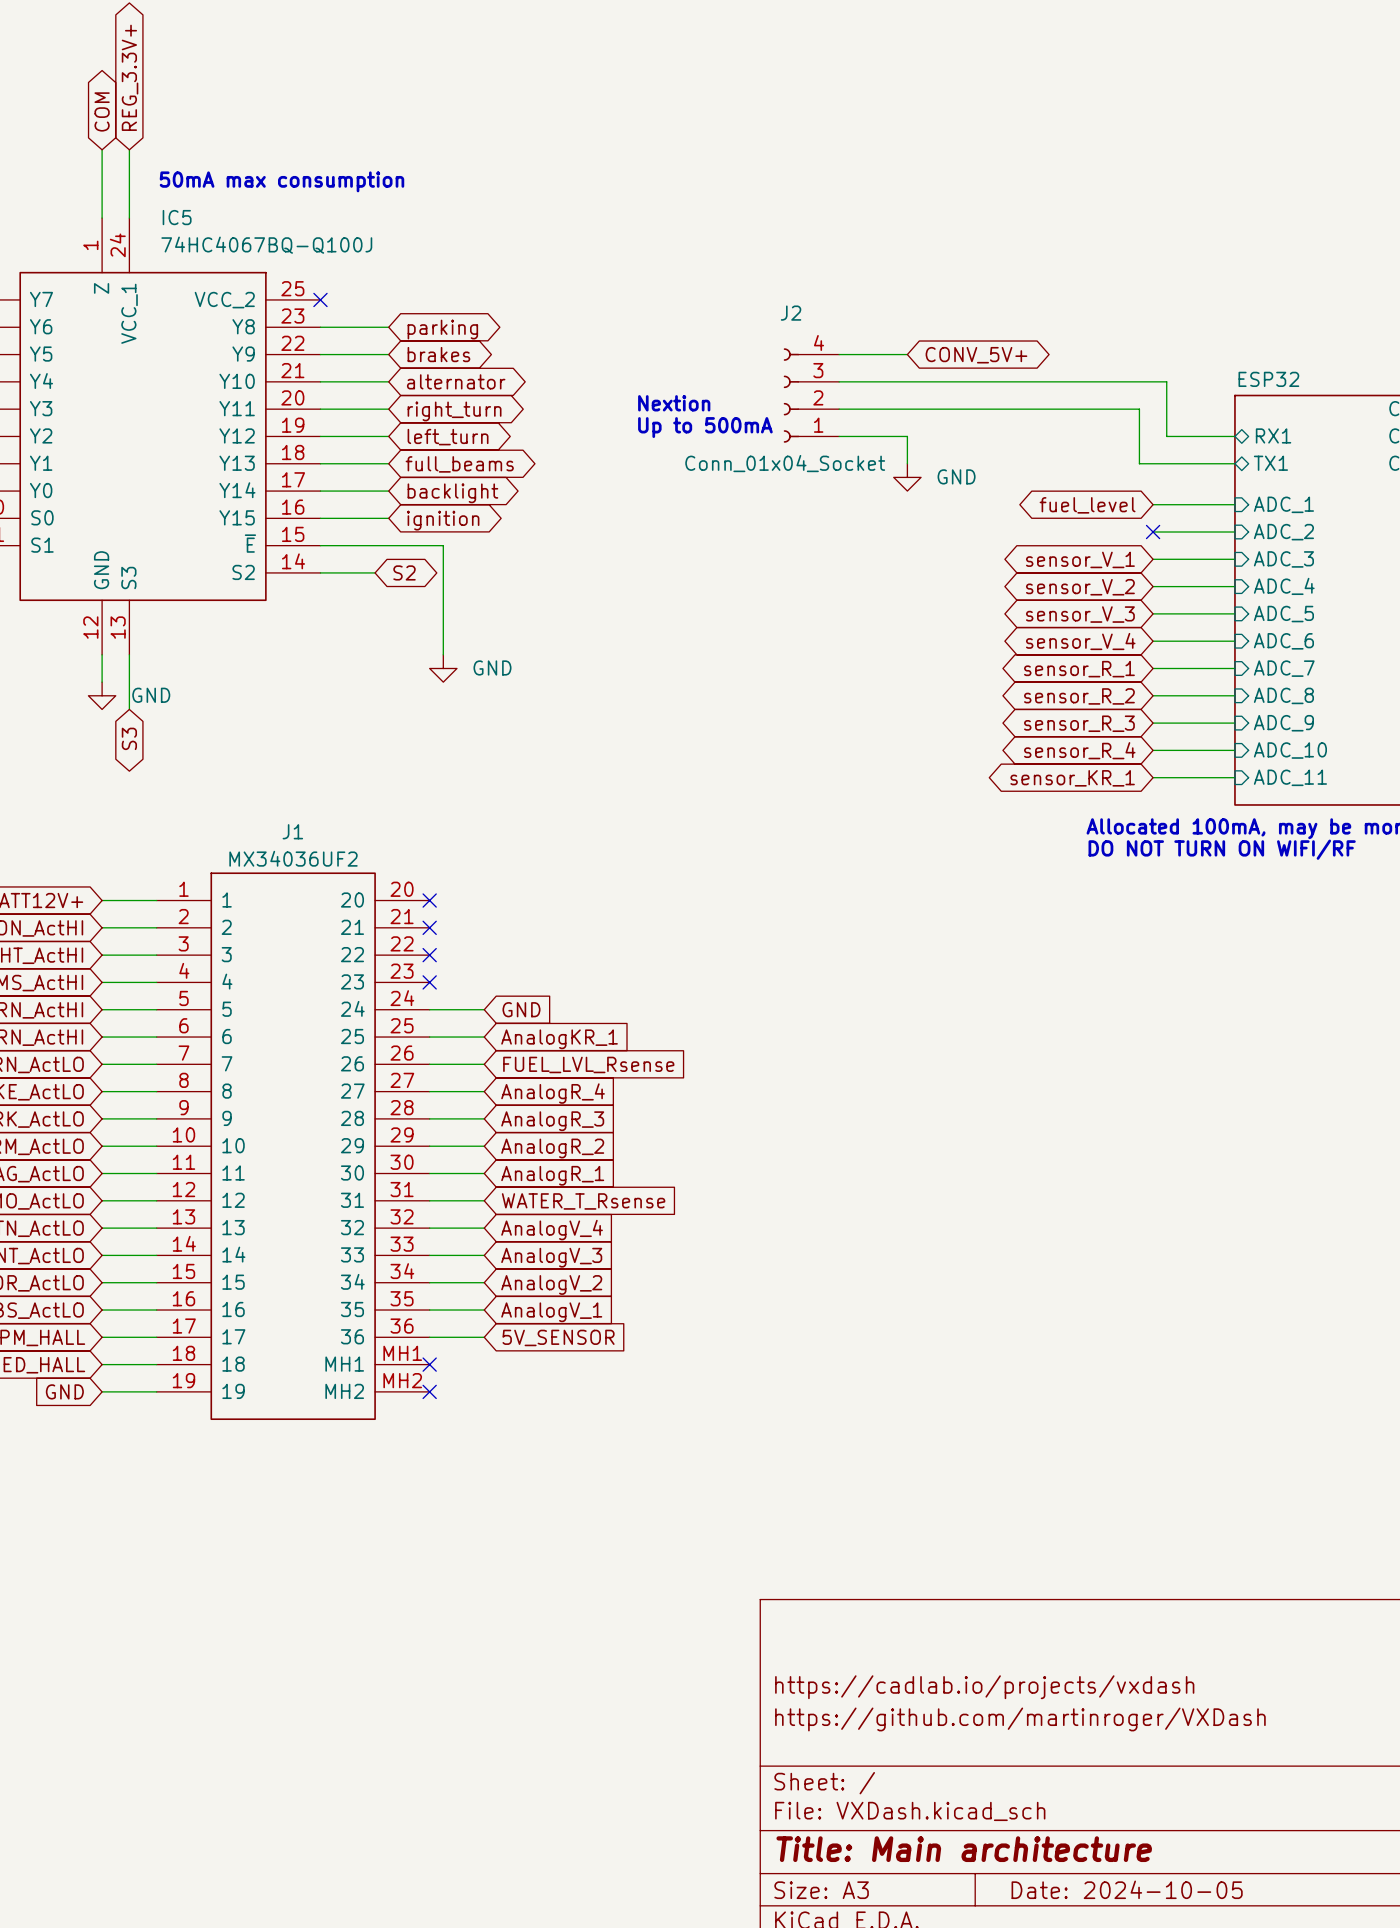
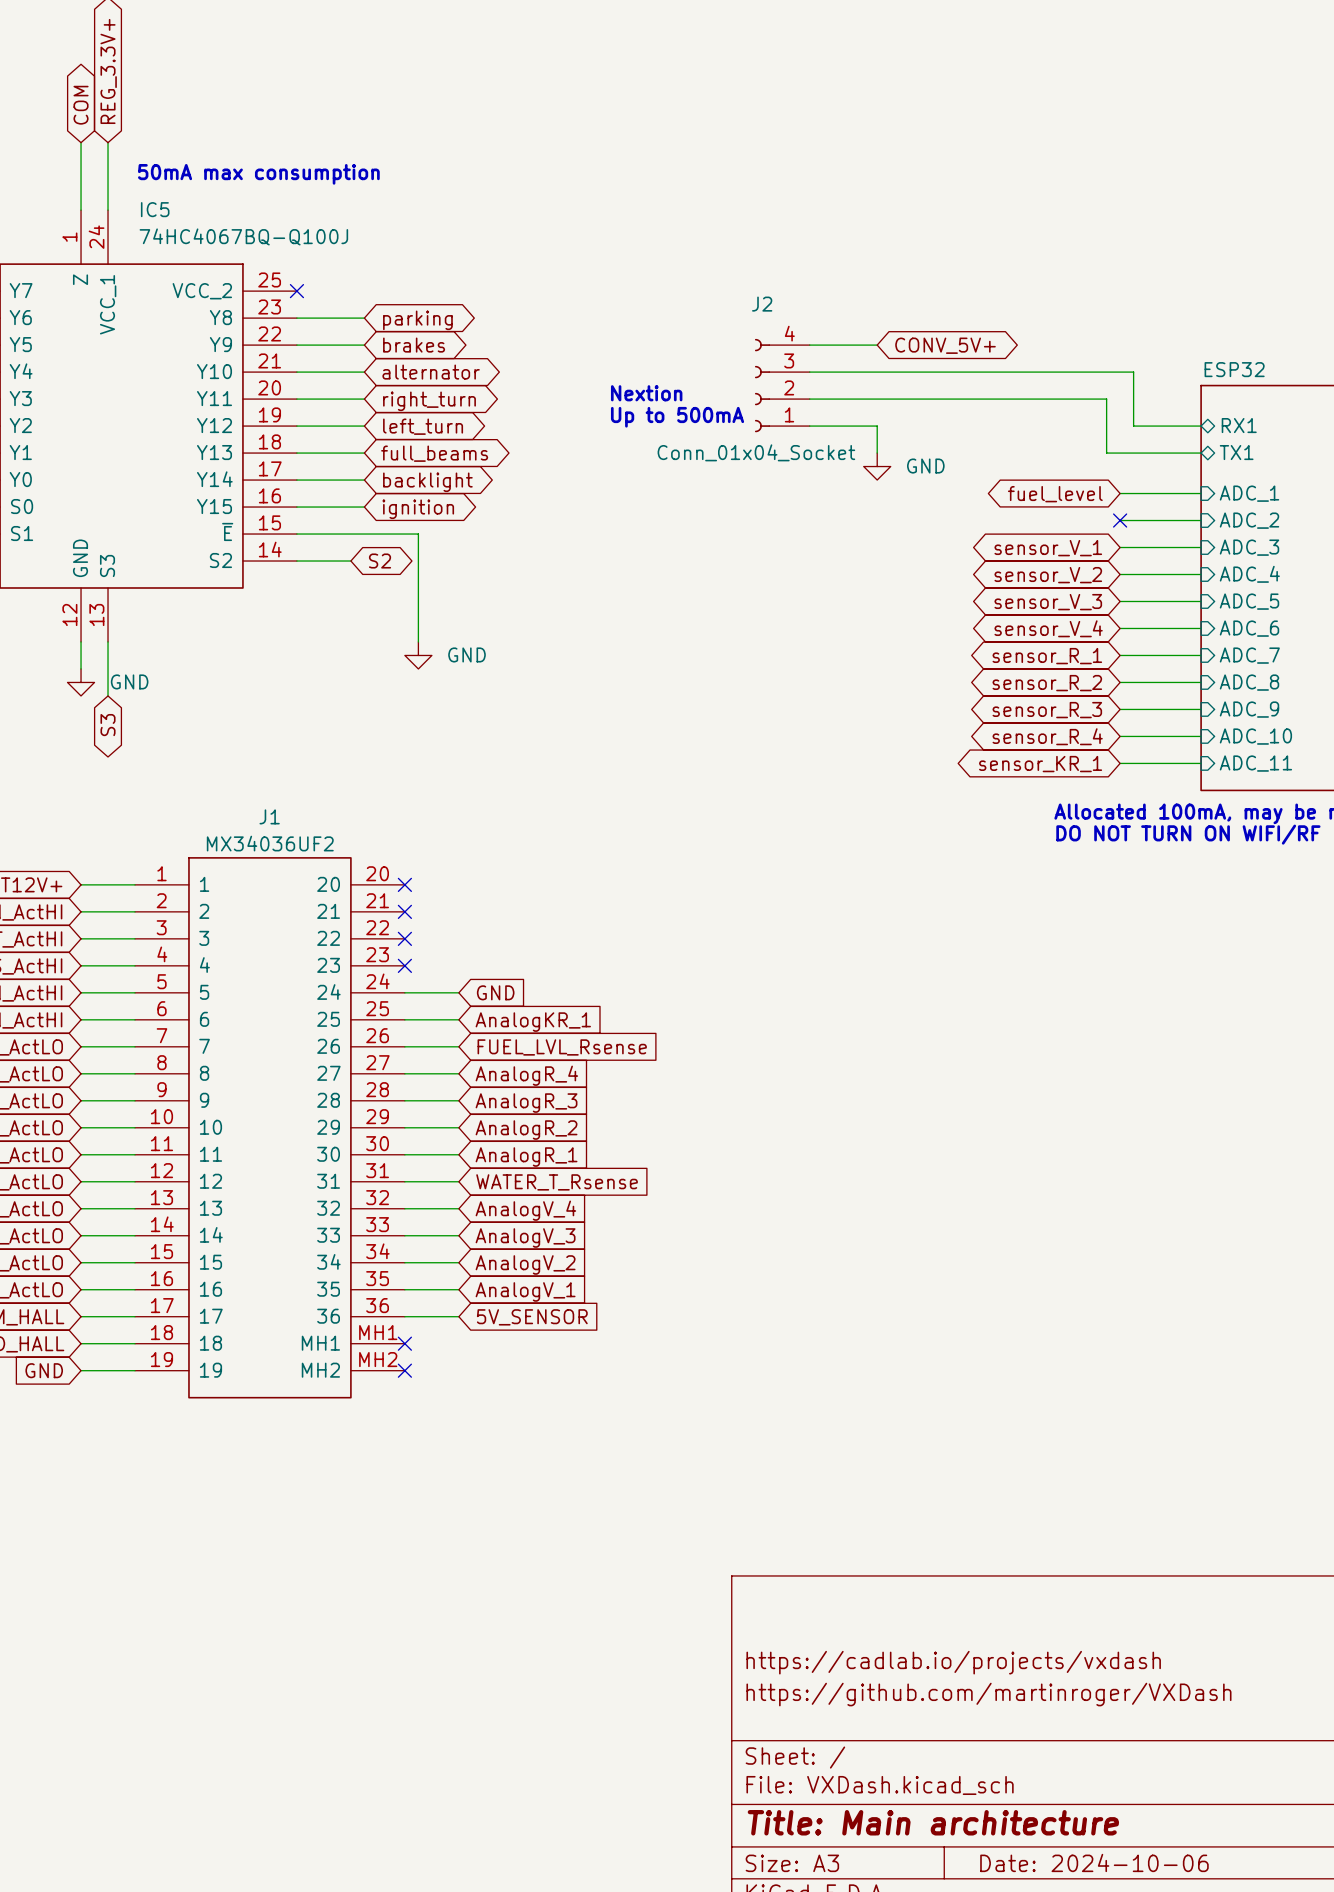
title block: Date: 2024-10-05 (1127, 1889) -> Date: 2024-10-06 (1094, 1862)

